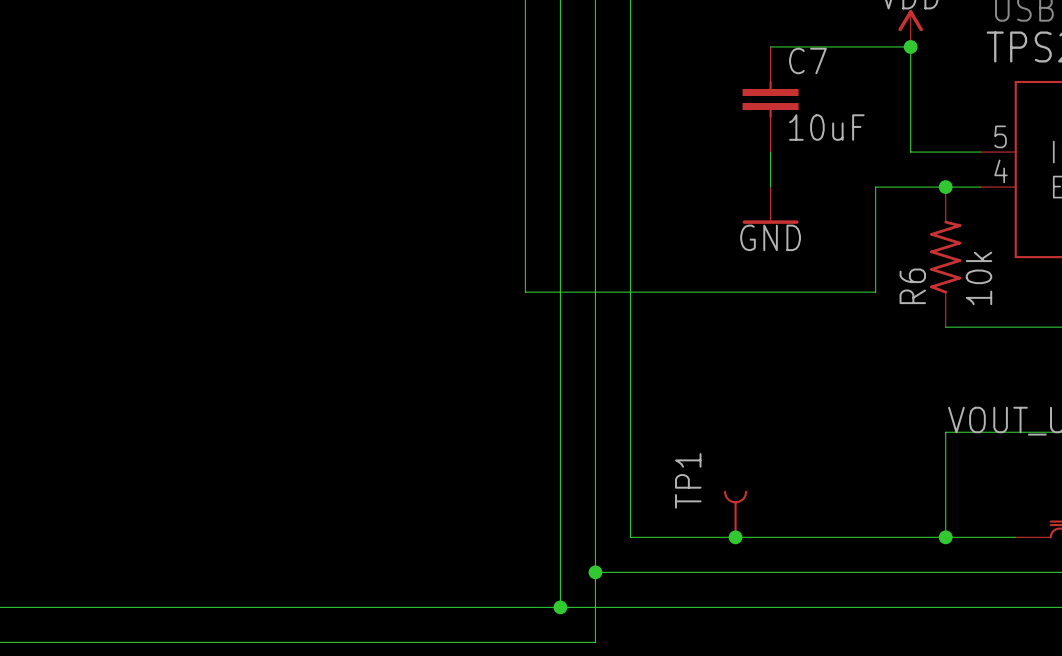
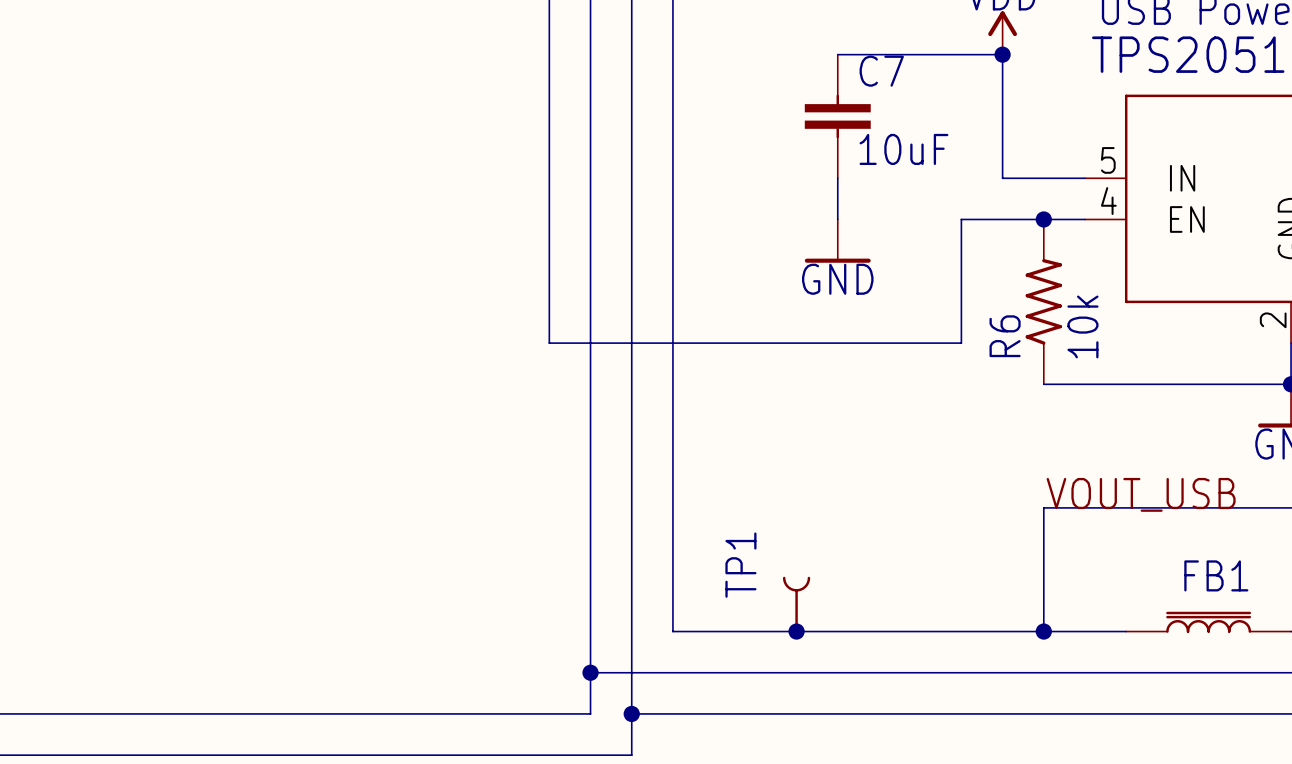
junction: none -> (590, 672)
junction: (595, 572) -> none
wire: (560, 607) (595, 607) -> (590, 672) (631, 672)
junction: (560, 607) -> none
junction: none -> (631, 713)

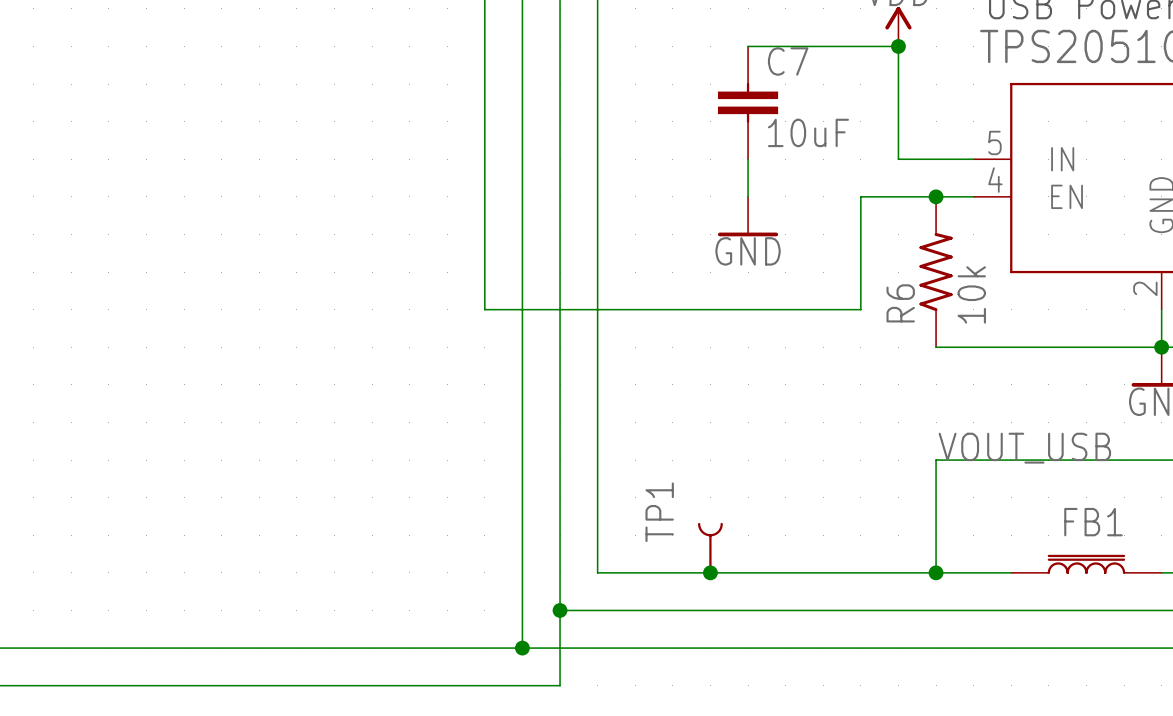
wire: (590, 672) (631, 672) -> (522, 648) (560, 648)
junction: (590, 672) -> none
junction: none -> (560, 610)
junction: none -> (522, 648)
junction: (631, 713) -> none

